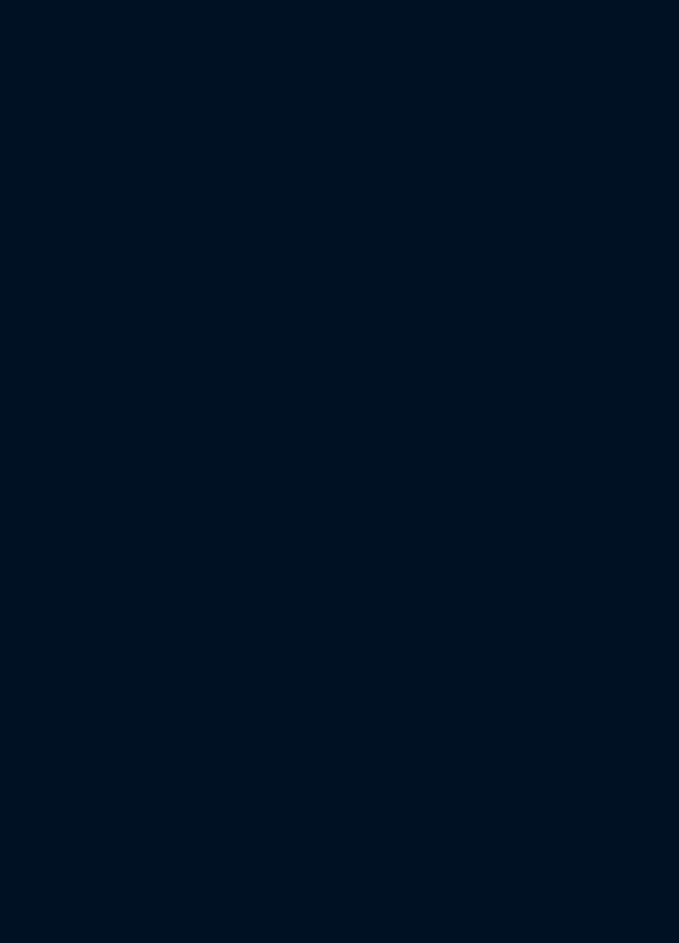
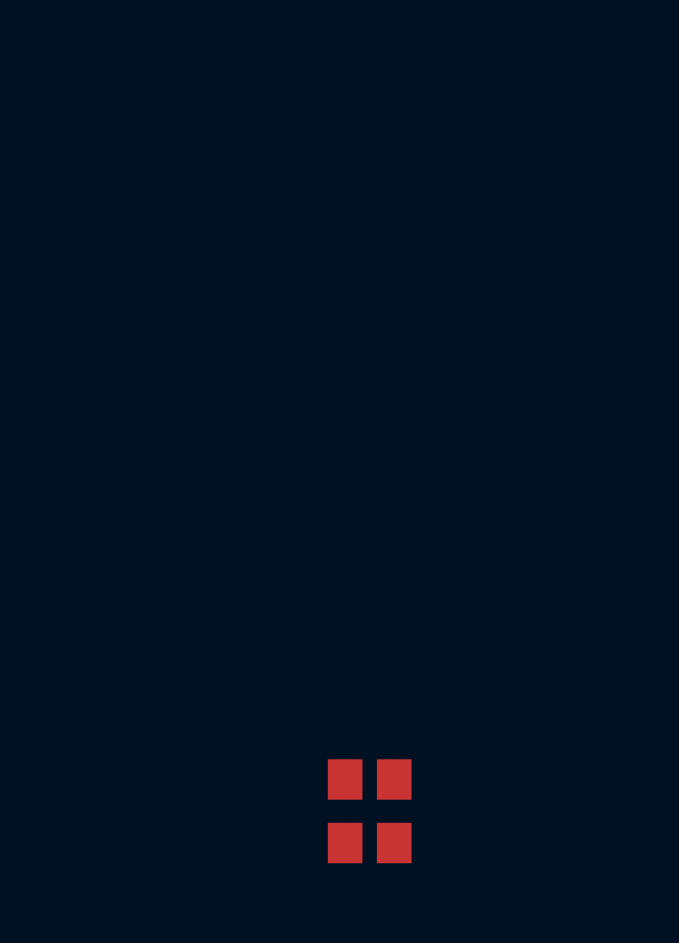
part: none -> (369, 811)

